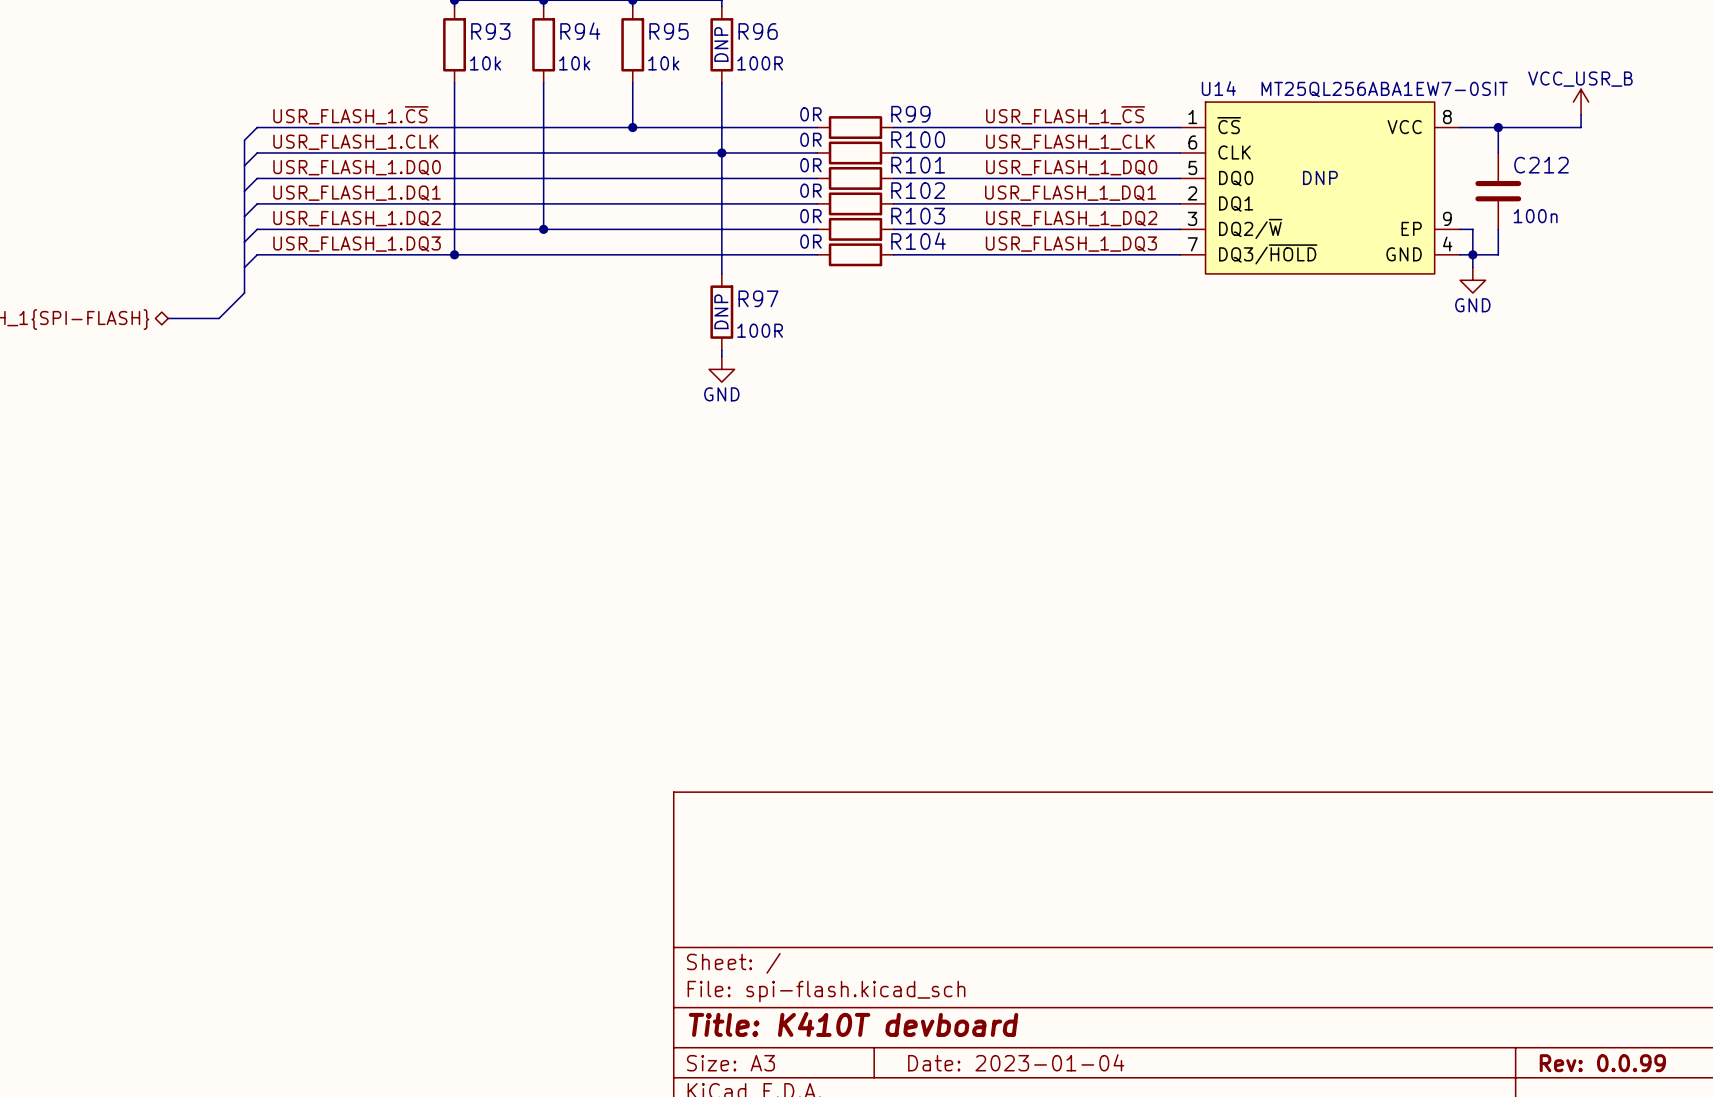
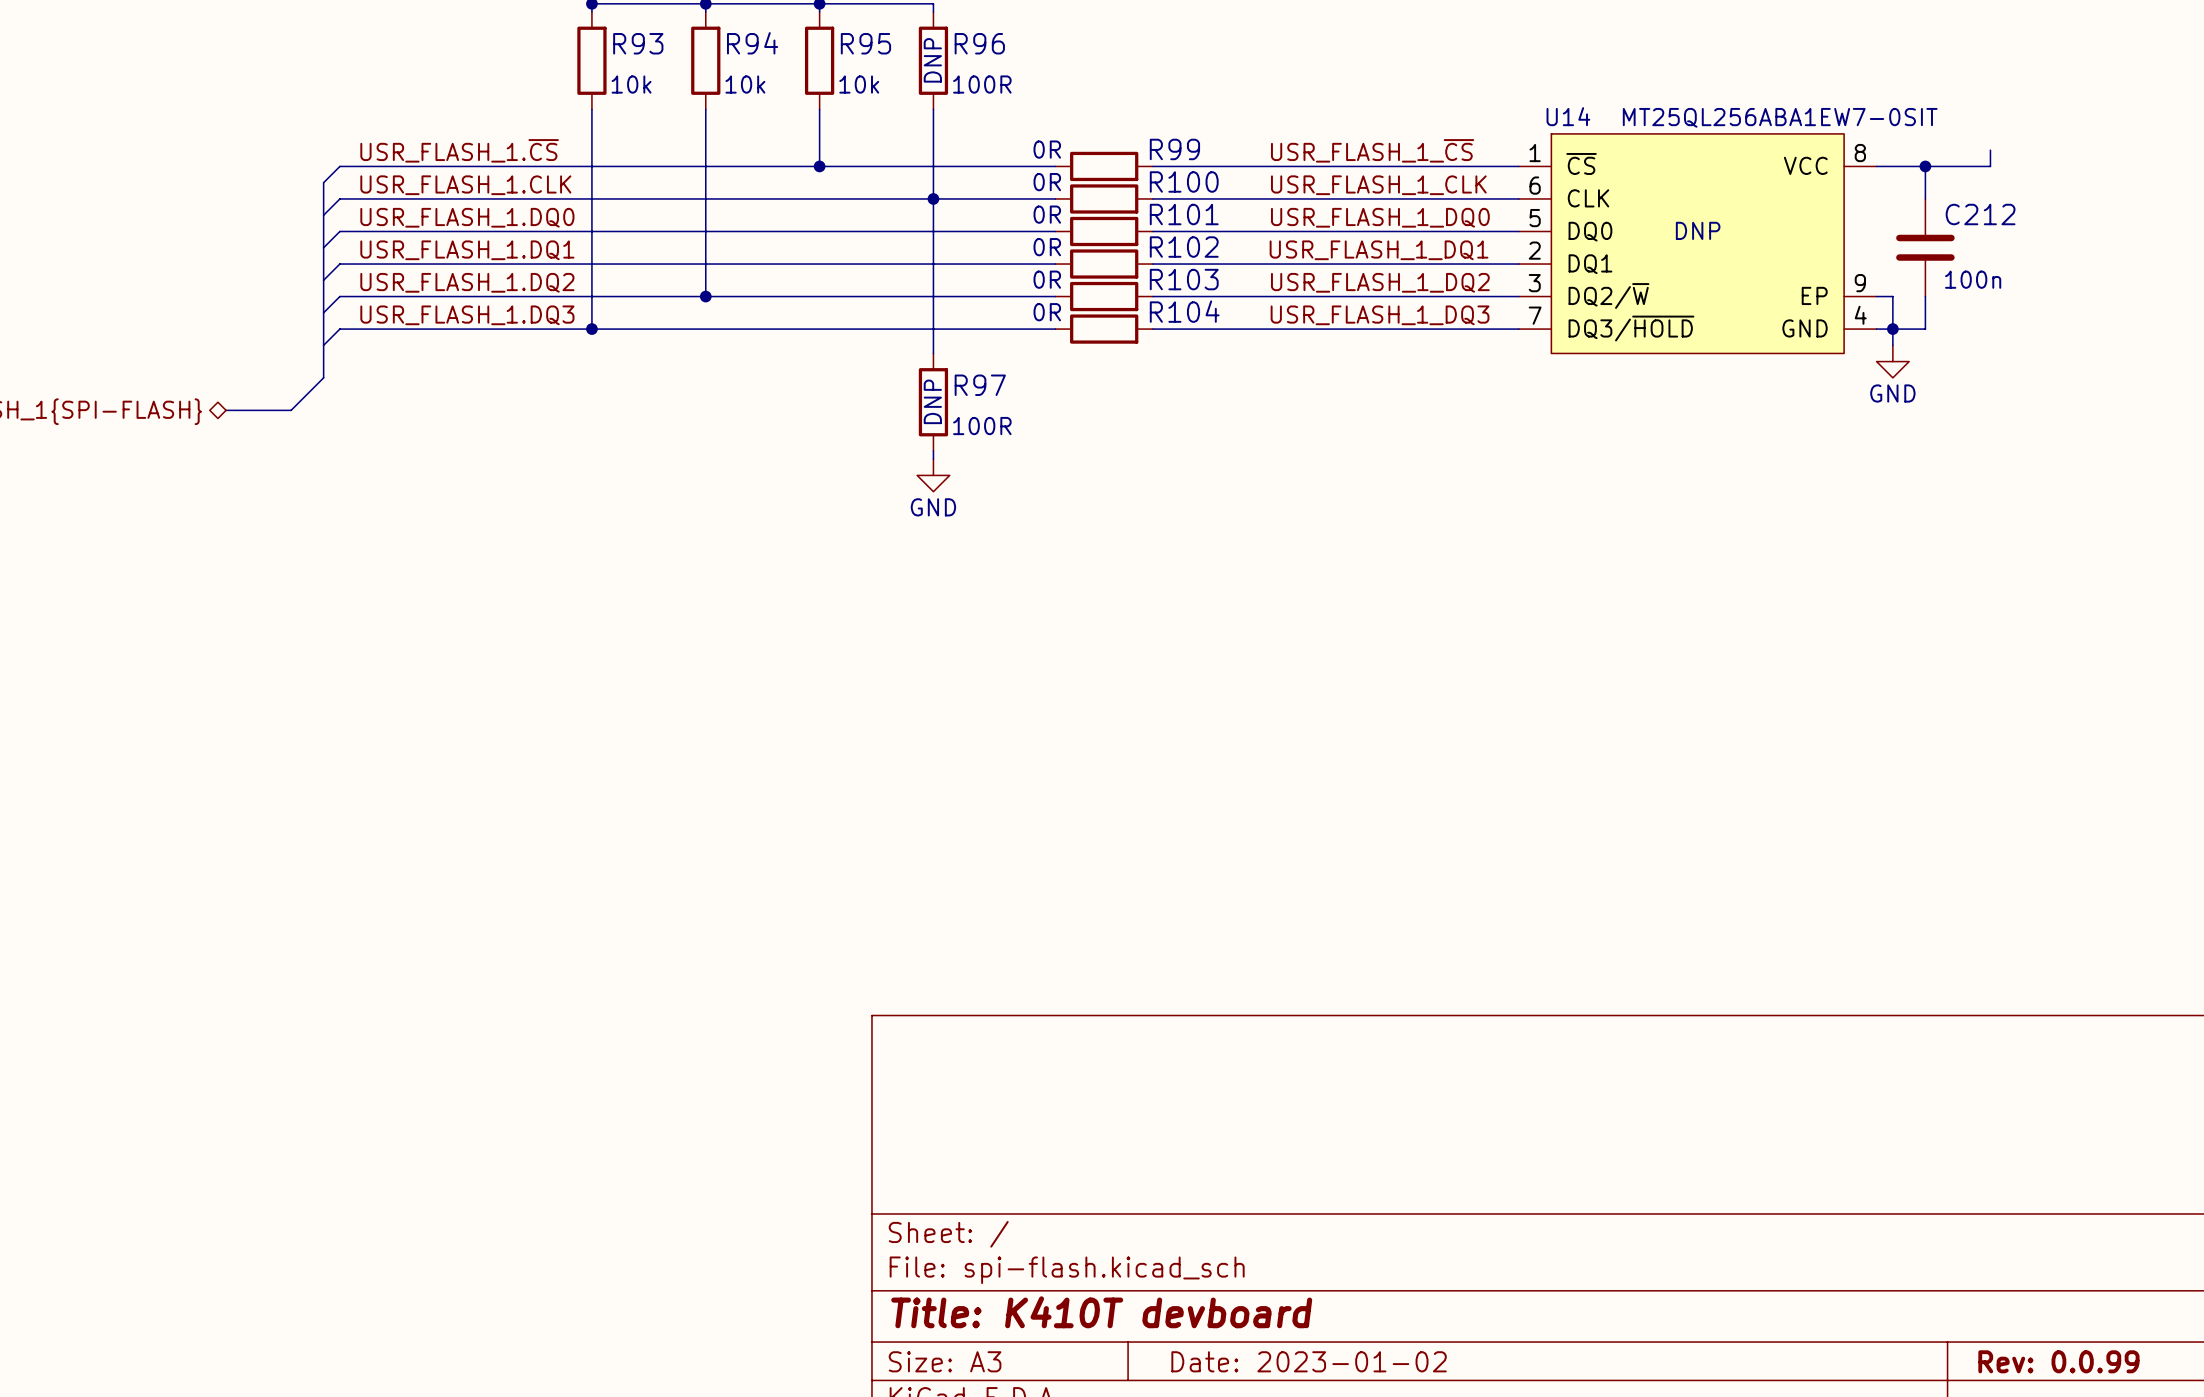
power symbol: VCC_USR_B (1581, 102) -> none
wire: (1581, 114) (1581, 127) (1549, 127) -> (1990, 150) (1990, 166)
title block: Date: 2023-01-04 (1016, 1062) -> Date: 2023-01-02 (1309, 1361)

